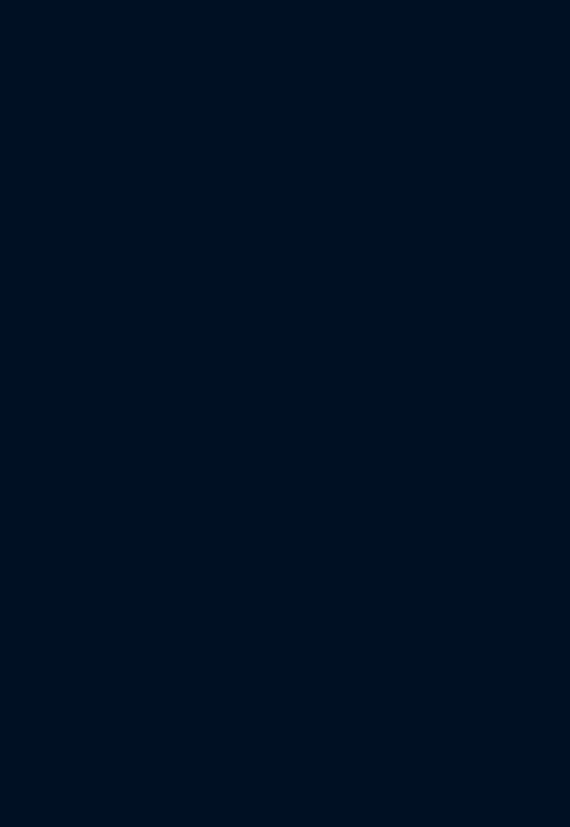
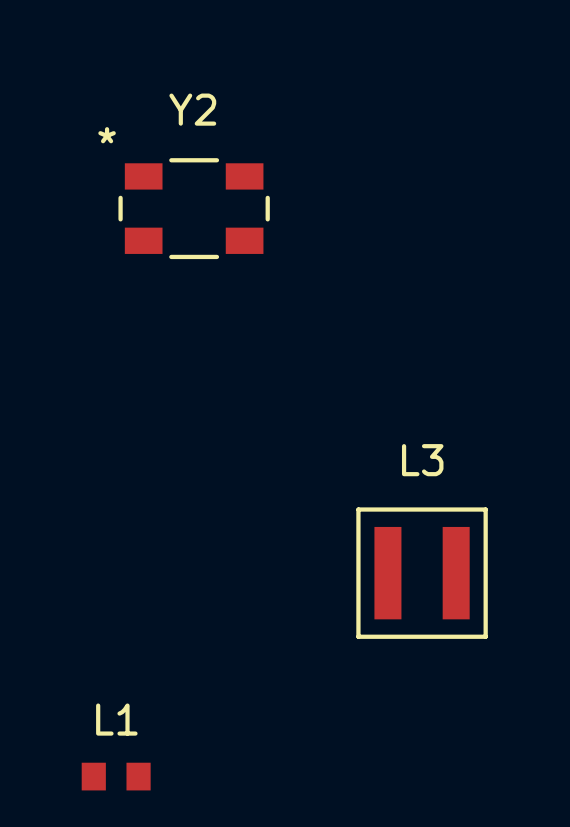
Y2: none -> (194, 208)
L3: none -> (422, 573)
L1: none -> (116, 776)

